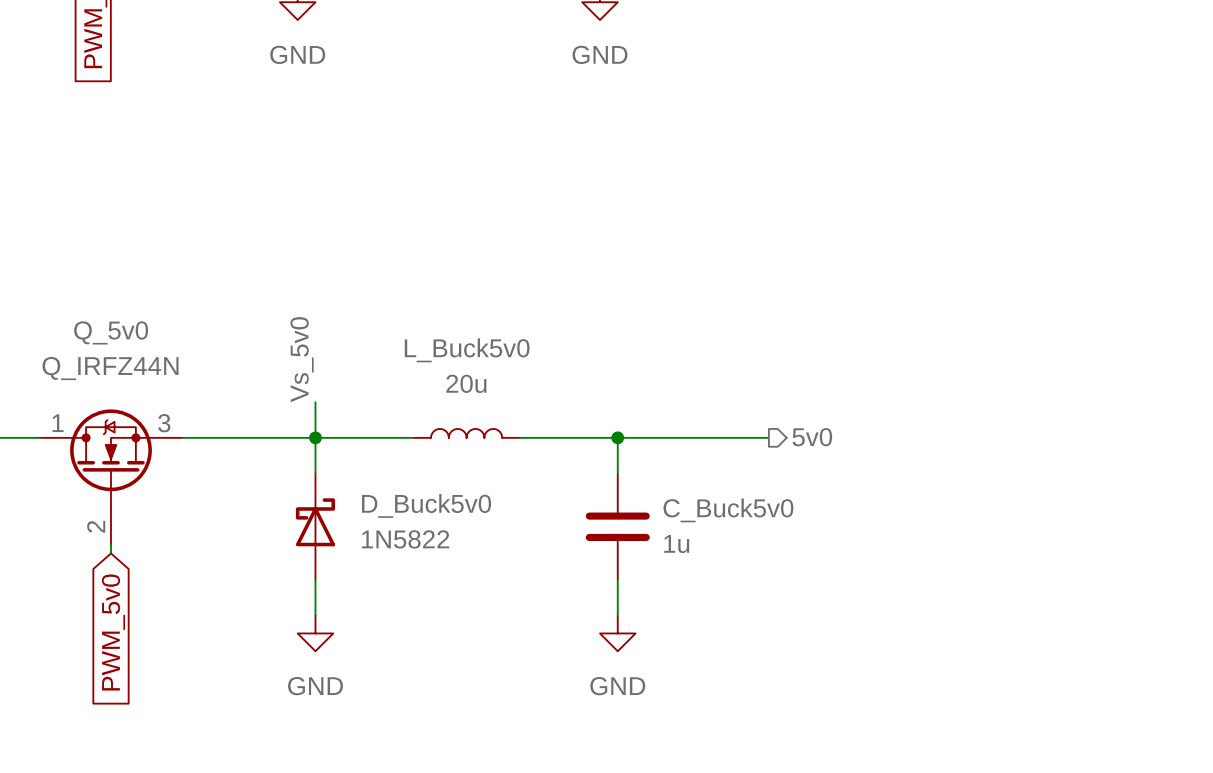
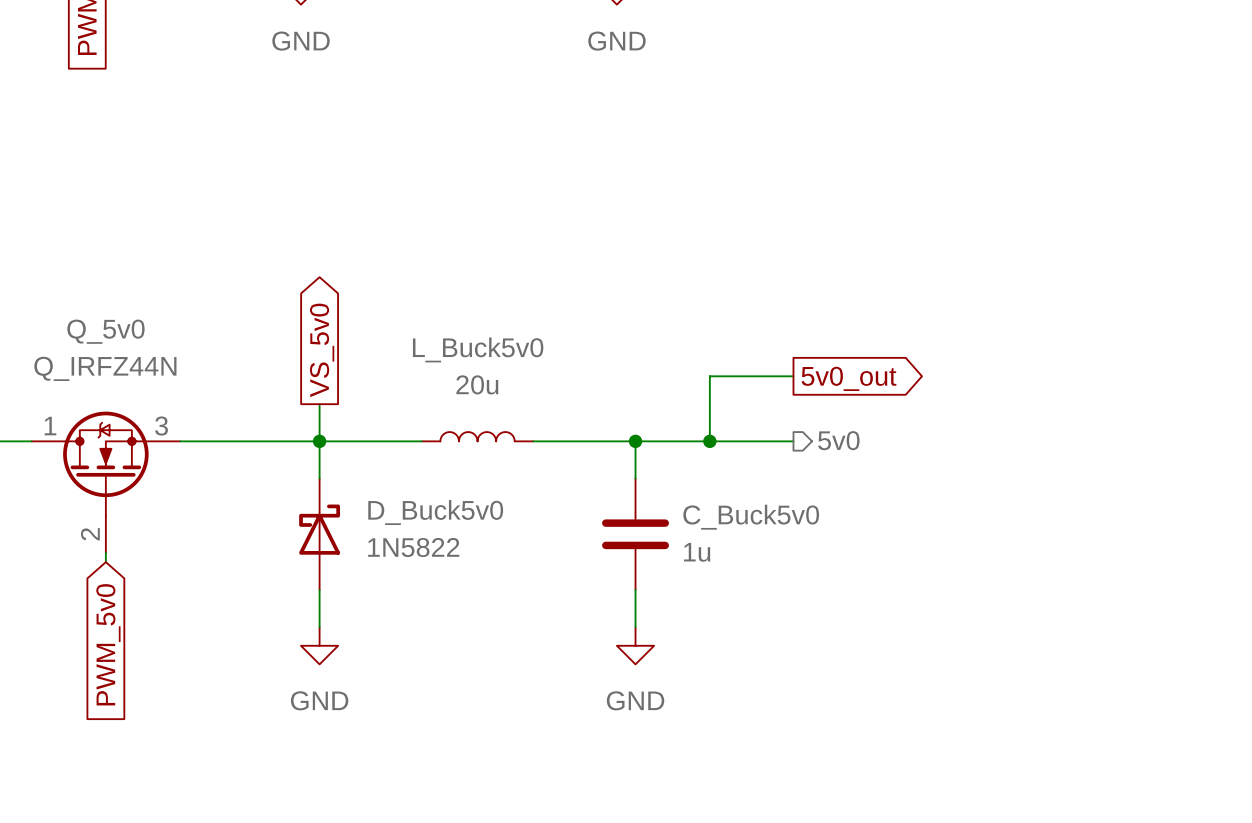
global label: none -> VS_5v0 (322, 350)
label: Vs_5v0 (302, 359) -> none
wire: none -> (793, 376) (709, 376) (709, 441)
global label: none -> 5v0_out (848, 378)
junction: none -> (709, 441)

